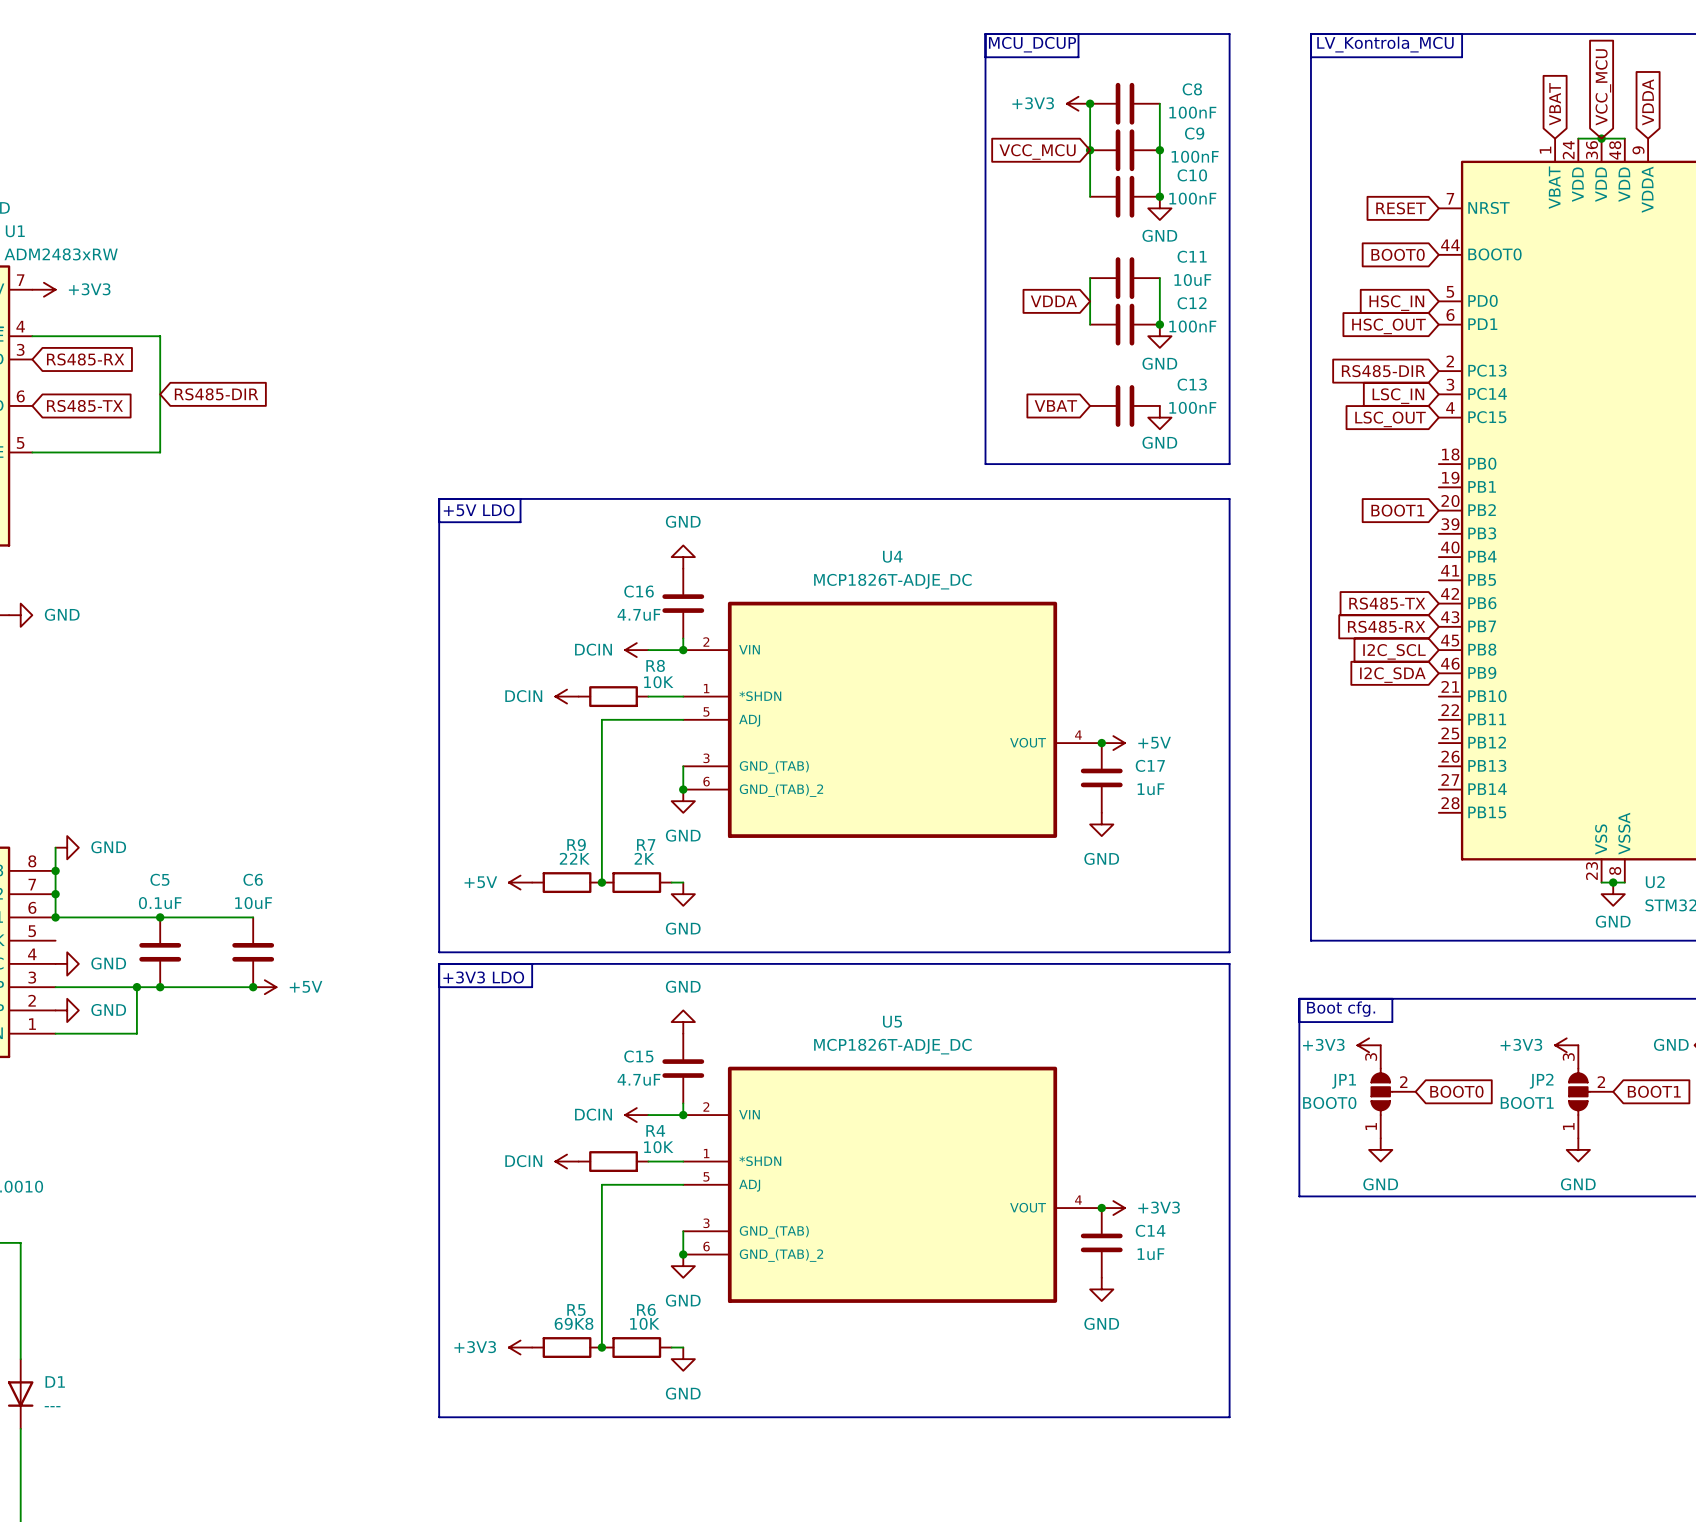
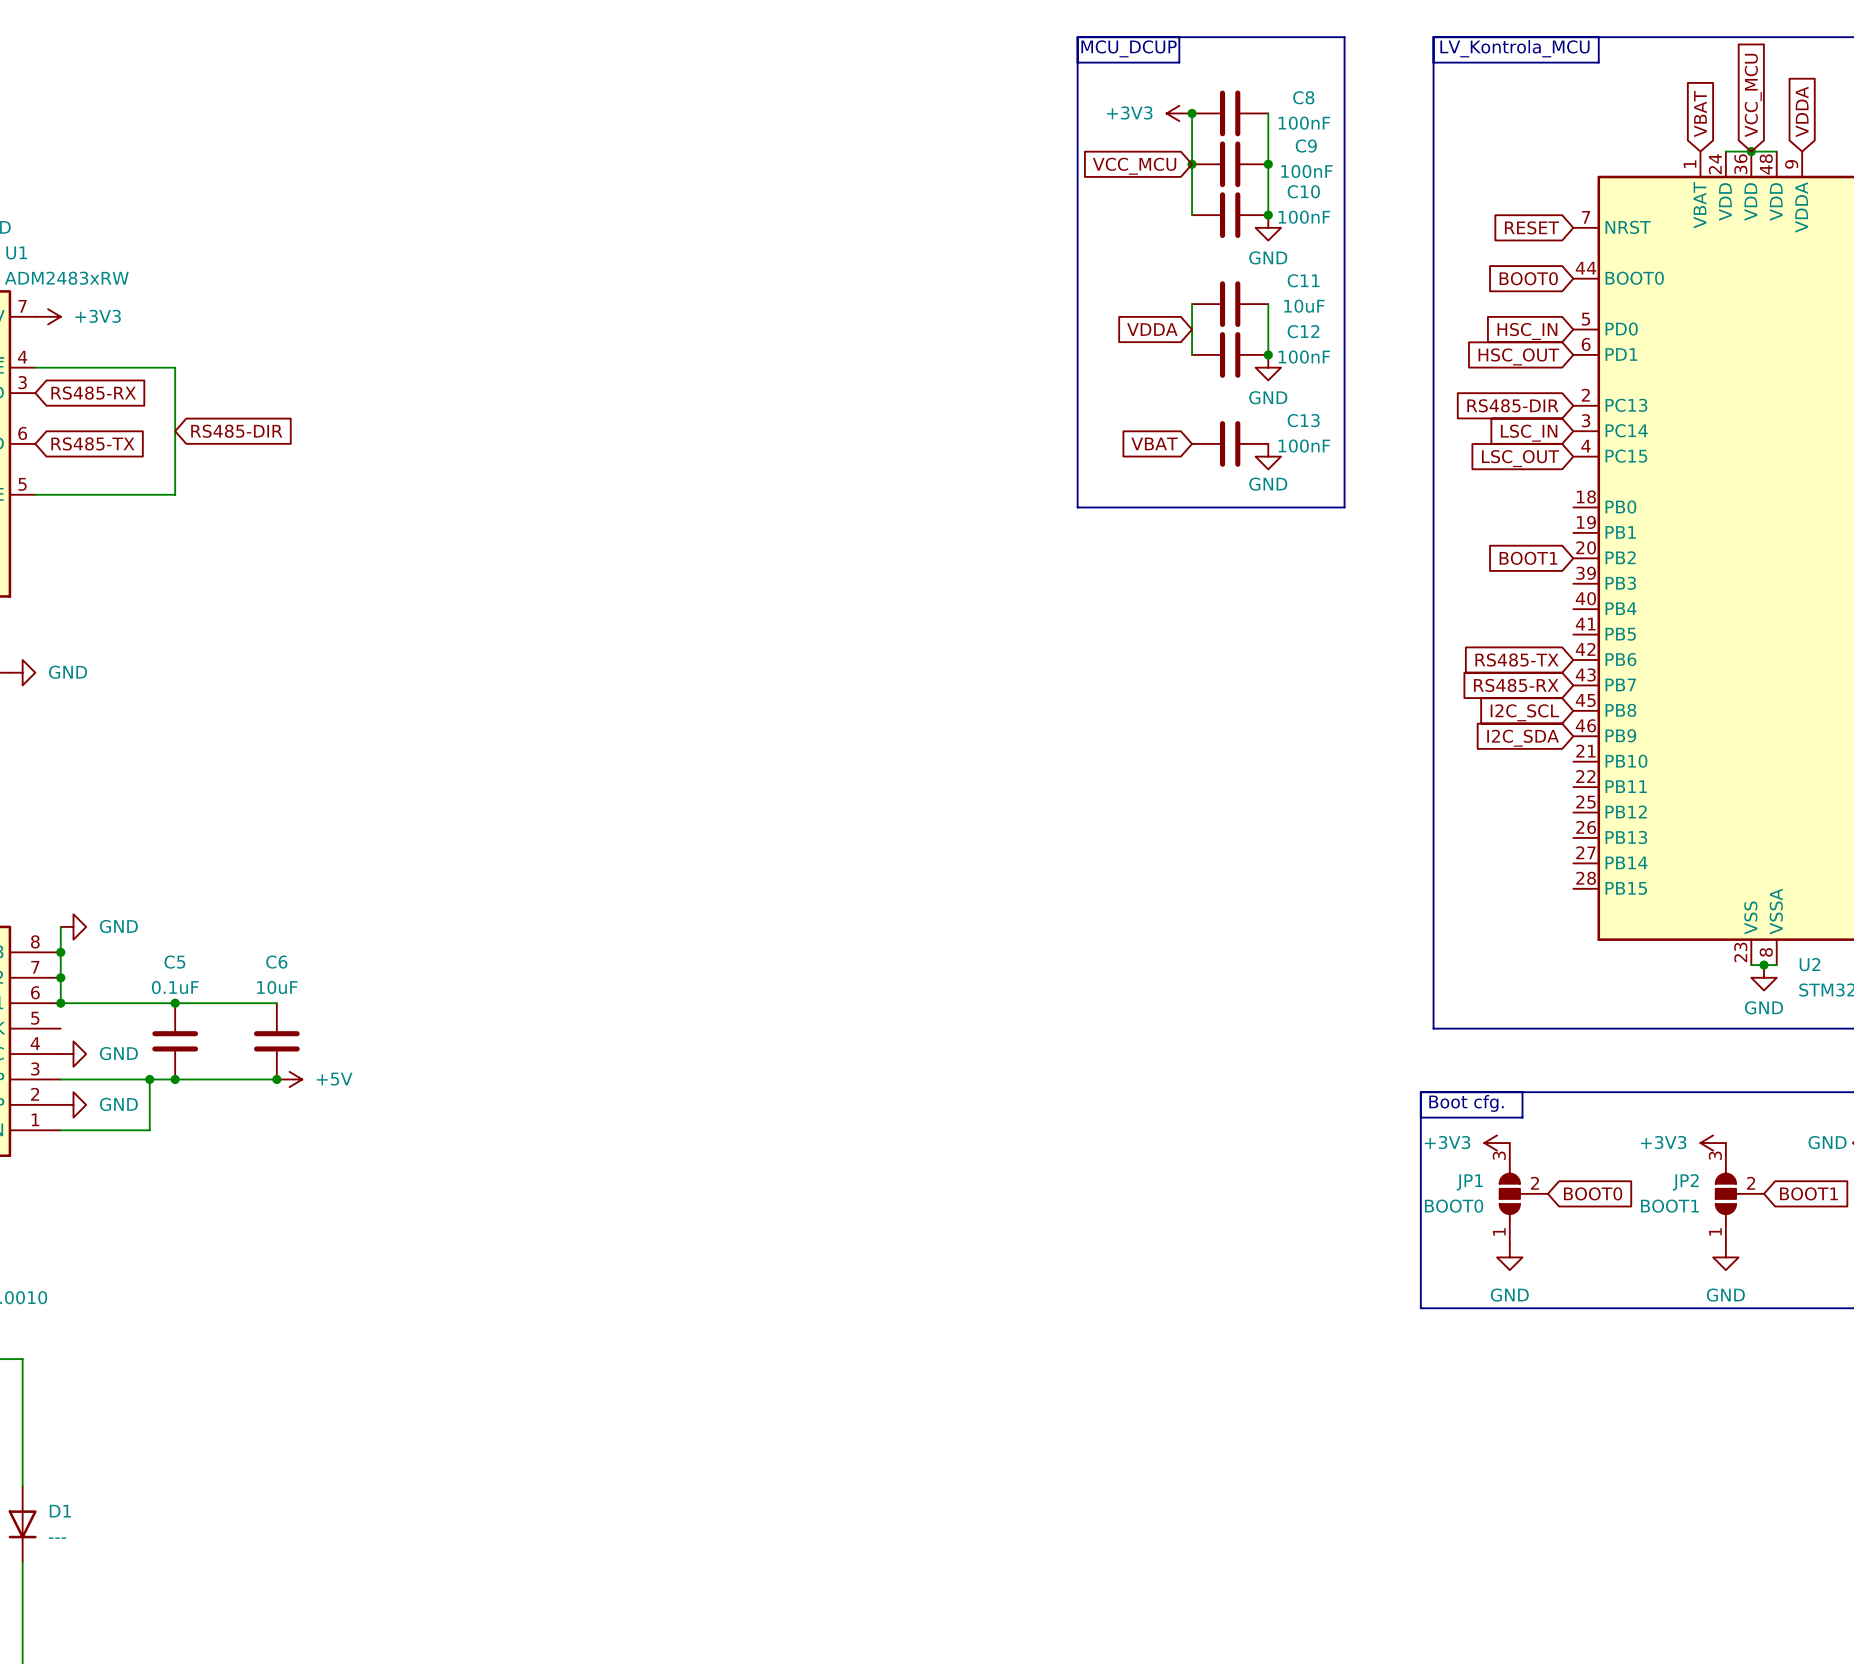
line: (439, 498) (439, 952) (1229, 952) (1229, 498) (439, 498) -> none
line: (520, 498) (520, 522) (439, 522) -> none
text: +5V LDO (479, 510) -> none
power symbol: GND (683, 557) -> none
C16: 4.7uF (683, 603) -> none
wire: (683, 638) (683, 650) (648, 650) -> none
power symbol: DCIN (636, 650) -> none
junction: (683, 650) -> none
power symbol: DCIN (567, 696) -> none
R8: 10K (613, 696) -> none
wire: (648, 696) (683, 696) -> none
wire: (683, 719) (601, 719) (601, 882) -> none
U4: MCP1826T-ADJE_DC (892, 719) -> none
junction: (1101, 743) -> none
power symbol: +5V (1113, 743) -> none
wire: (683, 766) (683, 789) -> none
C17: 1uF (1101, 777) -> none
junction: (683, 789) -> none
power symbol: GND (683, 801) -> none
power symbol: GND (1101, 824) -> none
power symbol: +5V (520, 882) -> none
R7: 2K (567, 882) -> none
junction: (601, 882) -> none
R9: 22K (636, 882) -> none
wire: (671, 882) (683, 882) -> none
power symbol: GND (683, 894) -> none
line: (439, 963) (1229, 963) (1229, 1417) (439, 1417) (439, 963) -> none
line: (532, 963) (532, 987) (439, 987) -> none
text: +3V3 LDO (483, 977) -> none
power symbol: GND (683, 1022) -> none
C15: 4.7uF (683, 1068) -> none
wire: (683, 1103) (683, 1115) (648, 1115) -> none
power symbol: DCIN (636, 1115) -> none
junction: (683, 1115) -> none
power symbol: DCIN (567, 1161) -> none
R4: 10K (613, 1161) -> none
wire: (648, 1161) (683, 1161) -> none
wire: (683, 1184) (601, 1184) (601, 1347) -> none
U5: MCP1826T-ADJE_DC (892, 1184) -> none
junction: (1101, 1208) -> none
power symbol: +3V3 (1113, 1208) -> none
wire: (683, 1231) (683, 1254) -> none
C14: 1uF (1101, 1242) -> none
junction: (683, 1254) -> none
power symbol: GND (683, 1266) -> none
power symbol: GND (1101, 1289) -> none
power symbol: +3V3 (520, 1347) -> none
R6: 10K (567, 1347) -> none
junction: (601, 1347) -> none
R5: 69K8 (636, 1347) -> none
wire: (671, 1347) (683, 1347) -> none
power symbol: GND (683, 1359) -> none

